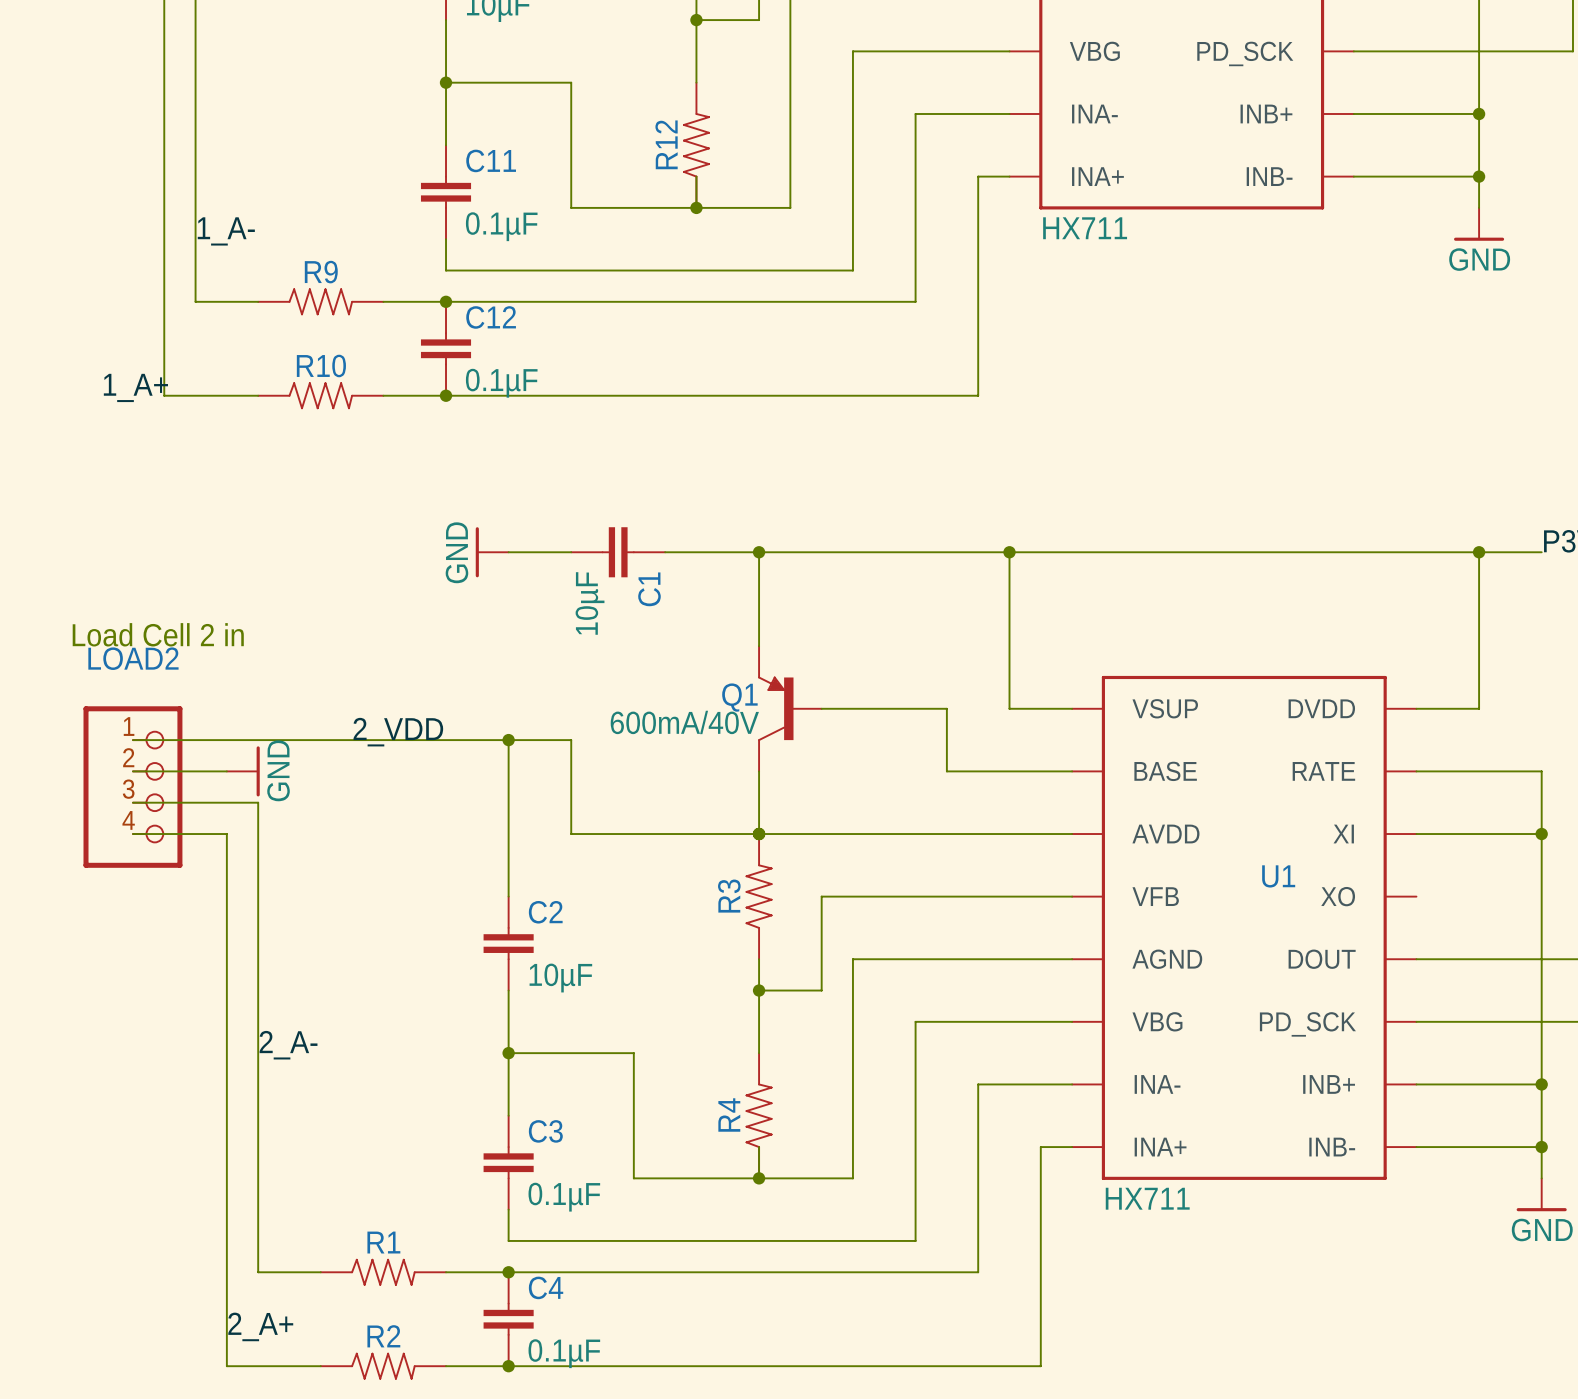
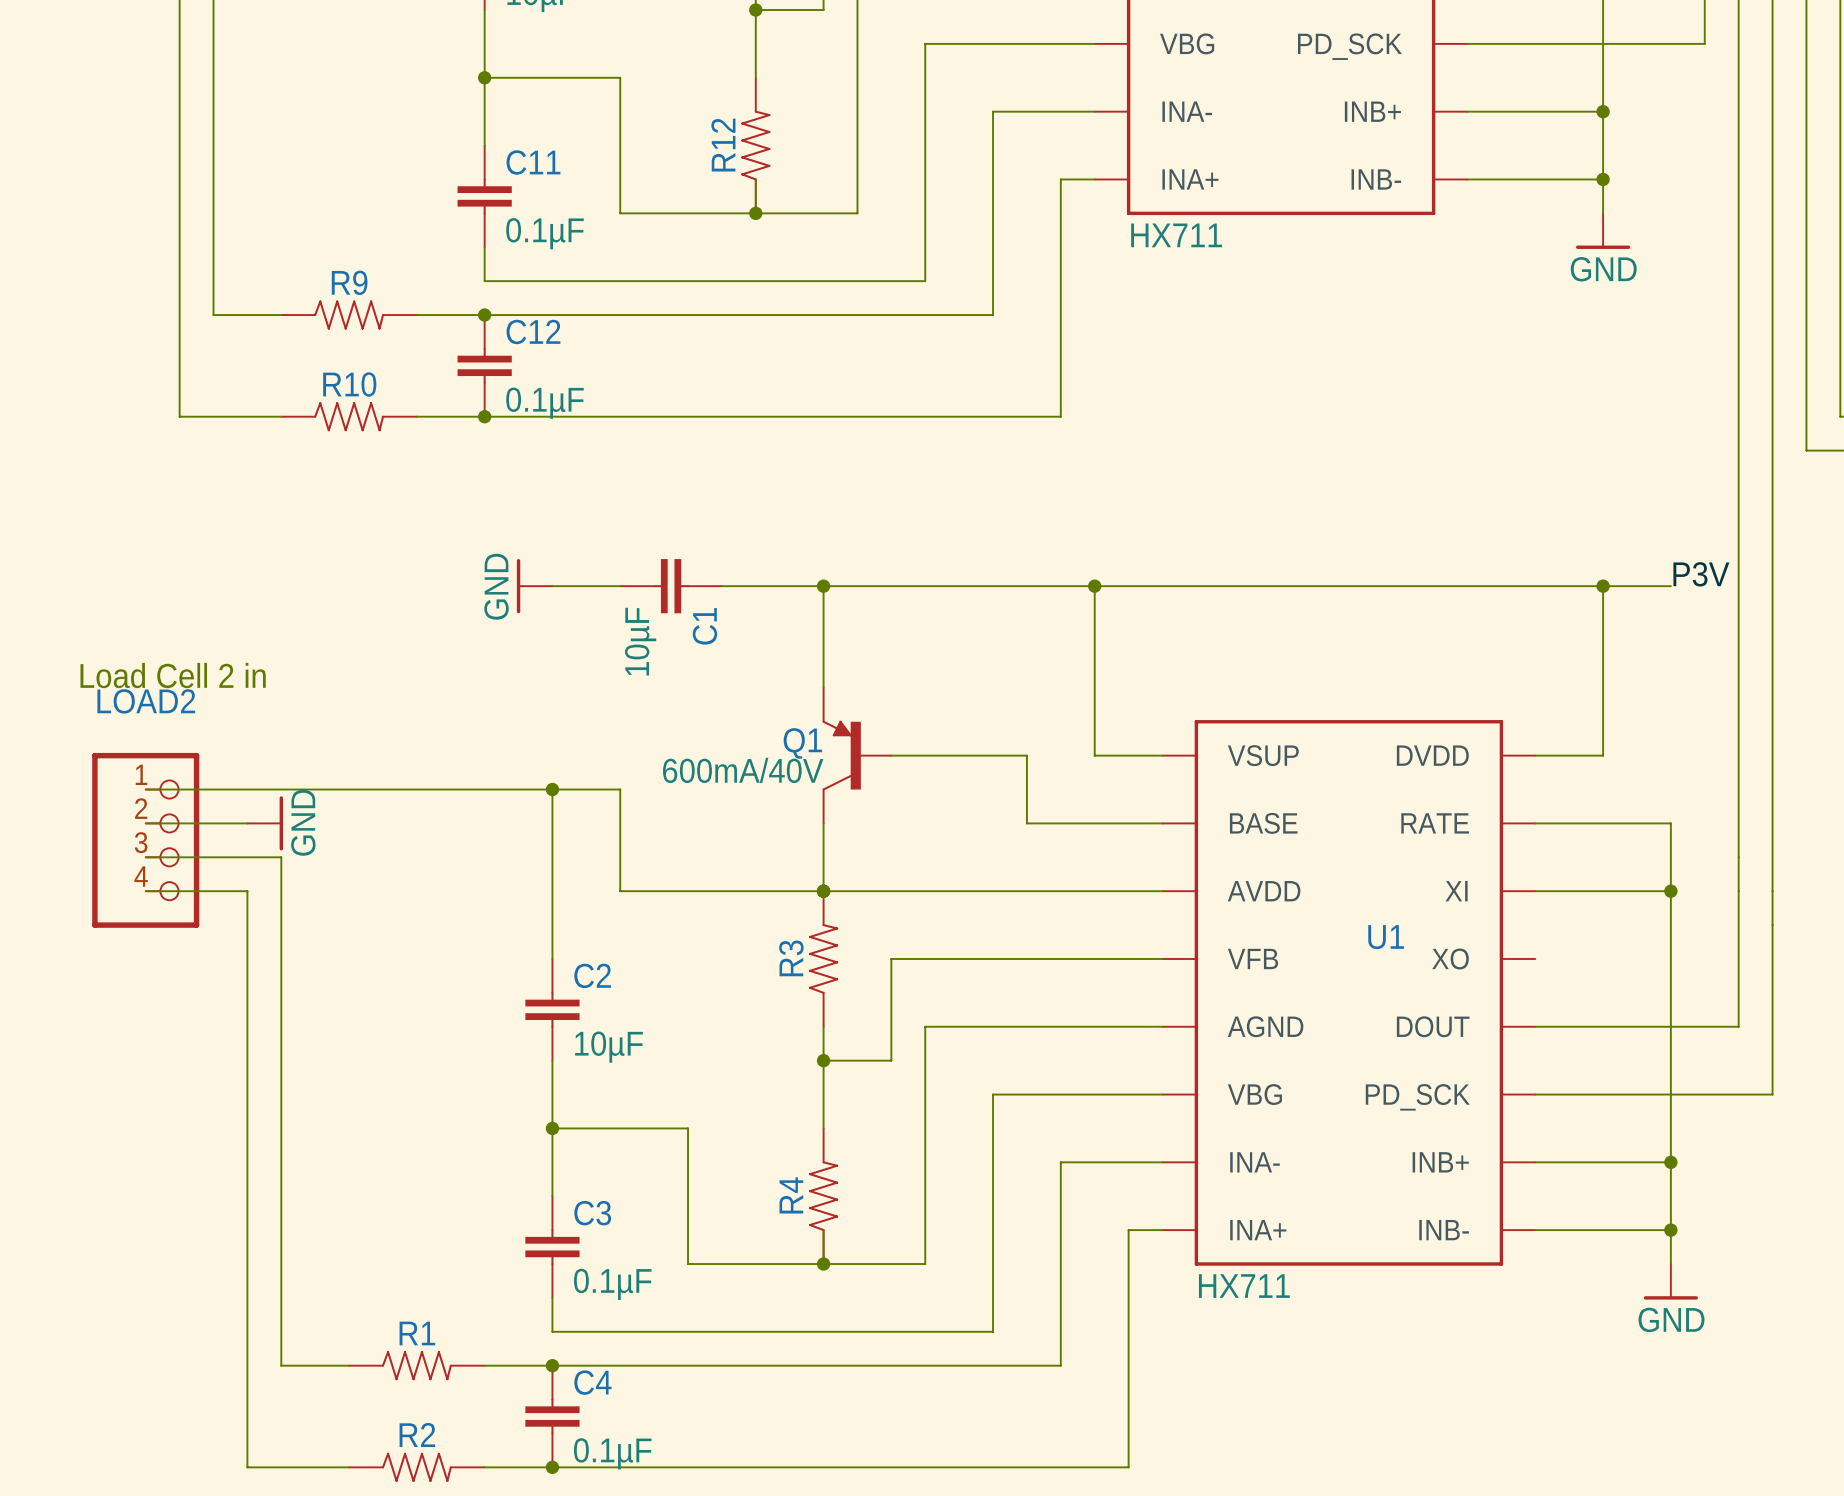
label: 1_A- (226, 231) -> none
label: 1_A+ (135, 387) -> none
label: 2_VDD (398, 732) -> none
label: 2_A- (288, 1045) -> none
label: 2_A+ (260, 1326) -> none

